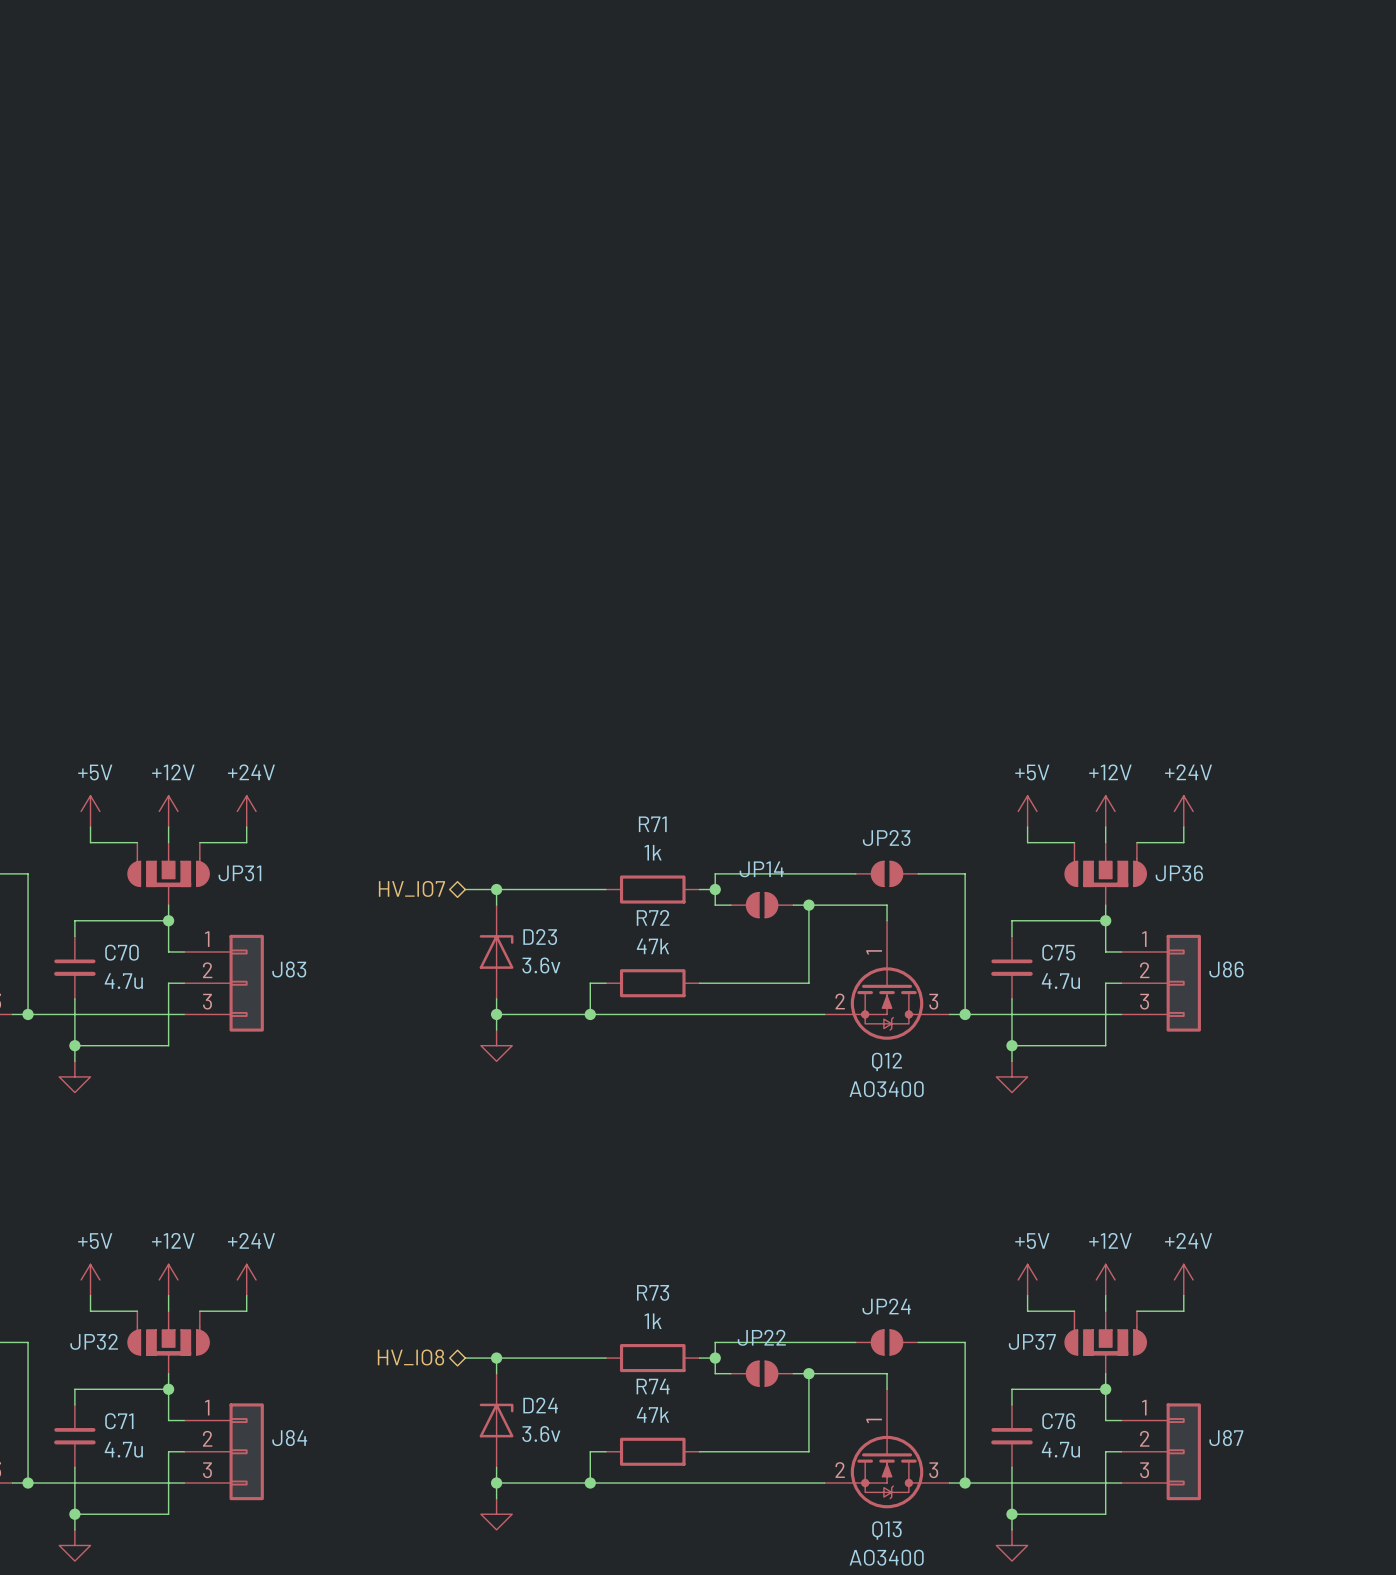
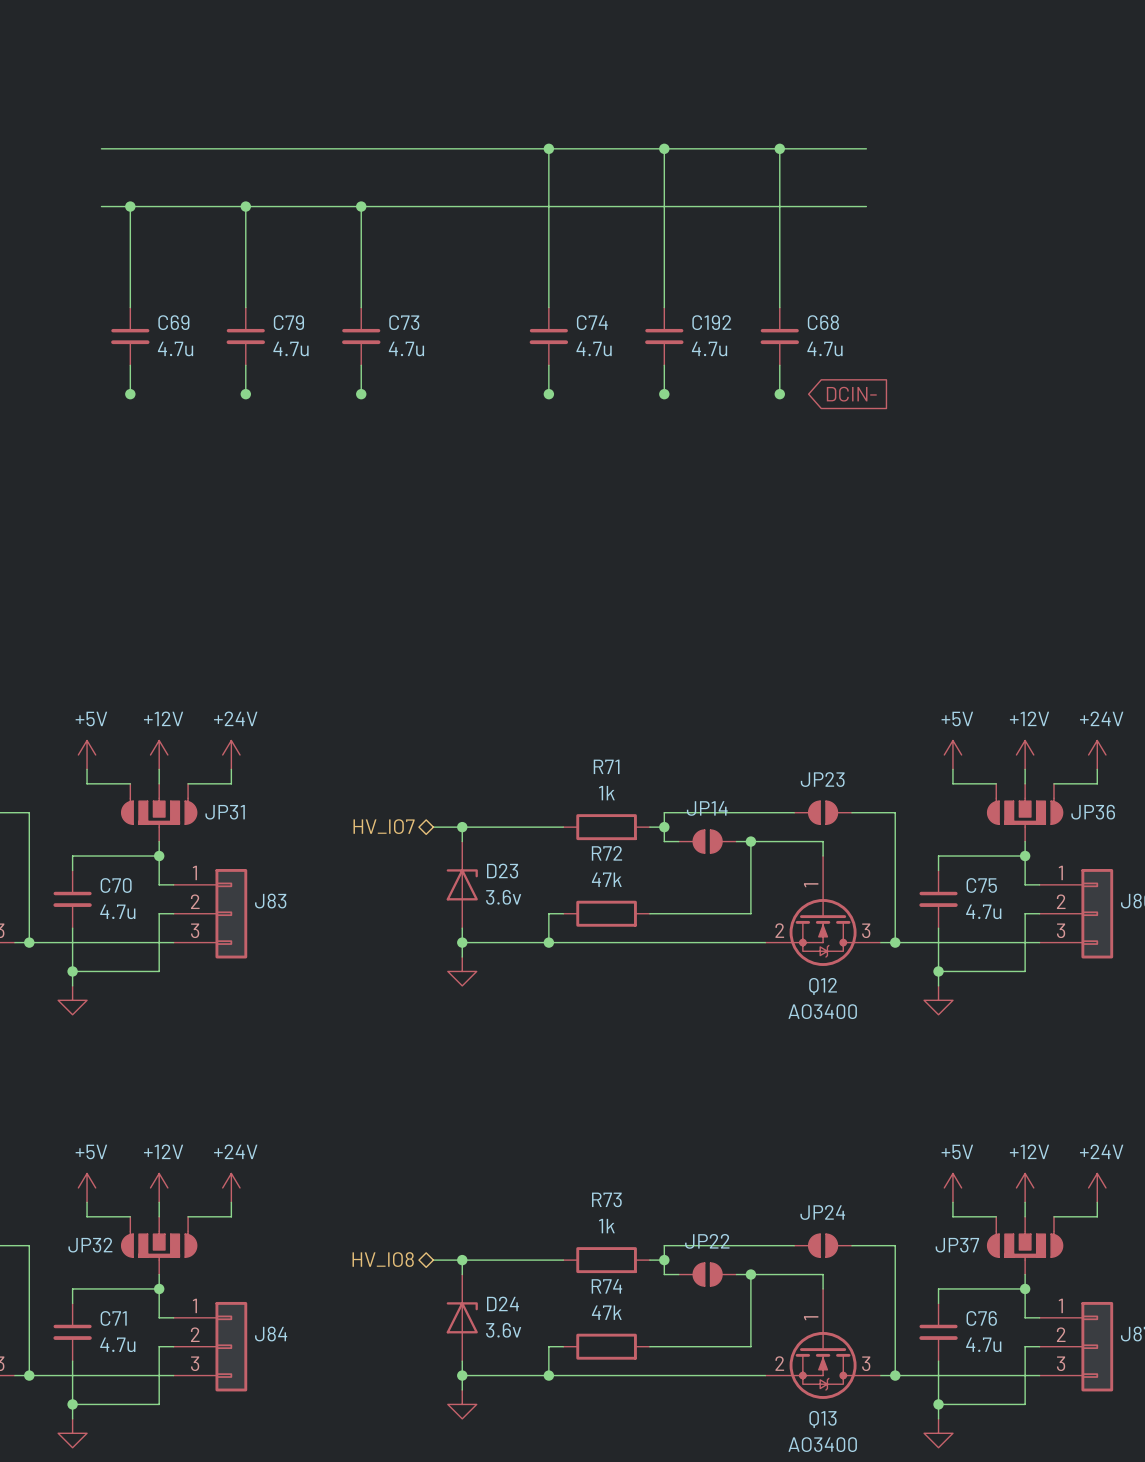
wire: none -> (101, 148) (866, 148)
wire: none -> (548, 148) (548, 307)
junction: none -> (548, 148)
wire: none -> (664, 148) (664, 307)
junction: none -> (664, 148)
wire: none -> (779, 148) (779, 307)
junction: none -> (779, 148)
wire: none -> (101, 206) (866, 206)
wire: none -> (130, 206) (130, 307)
junction: none -> (130, 206)
wire: none -> (245, 206) (245, 307)
junction: none -> (245, 206)
wire: none -> (361, 206) (361, 307)
junction: none -> (361, 206)
C69: none -> 4.7u (130, 336)
C79: none -> 4.7u (245, 336)
C73: none -> 4.7u (361, 336)
C74: none -> 4.7u (548, 336)
C192: none -> 4.7u (664, 336)
C68: none -> 4.7u (779, 336)
wire: none -> (130, 365) (130, 394)
wire: none -> (245, 365) (245, 394)
wire: none -> (361, 365) (361, 394)
wire: none -> (548, 365) (548, 394)
wire: none -> (664, 365) (664, 394)
wire: none -> (779, 365) (779, 394)
junction: none -> (130, 394)
junction: none -> (245, 394)
junction: none -> (361, 394)
junction: none -> (548, 394)
junction: none -> (664, 394)
junction: none -> (779, 394)
global label: none -> DCIN- (851, 394)

